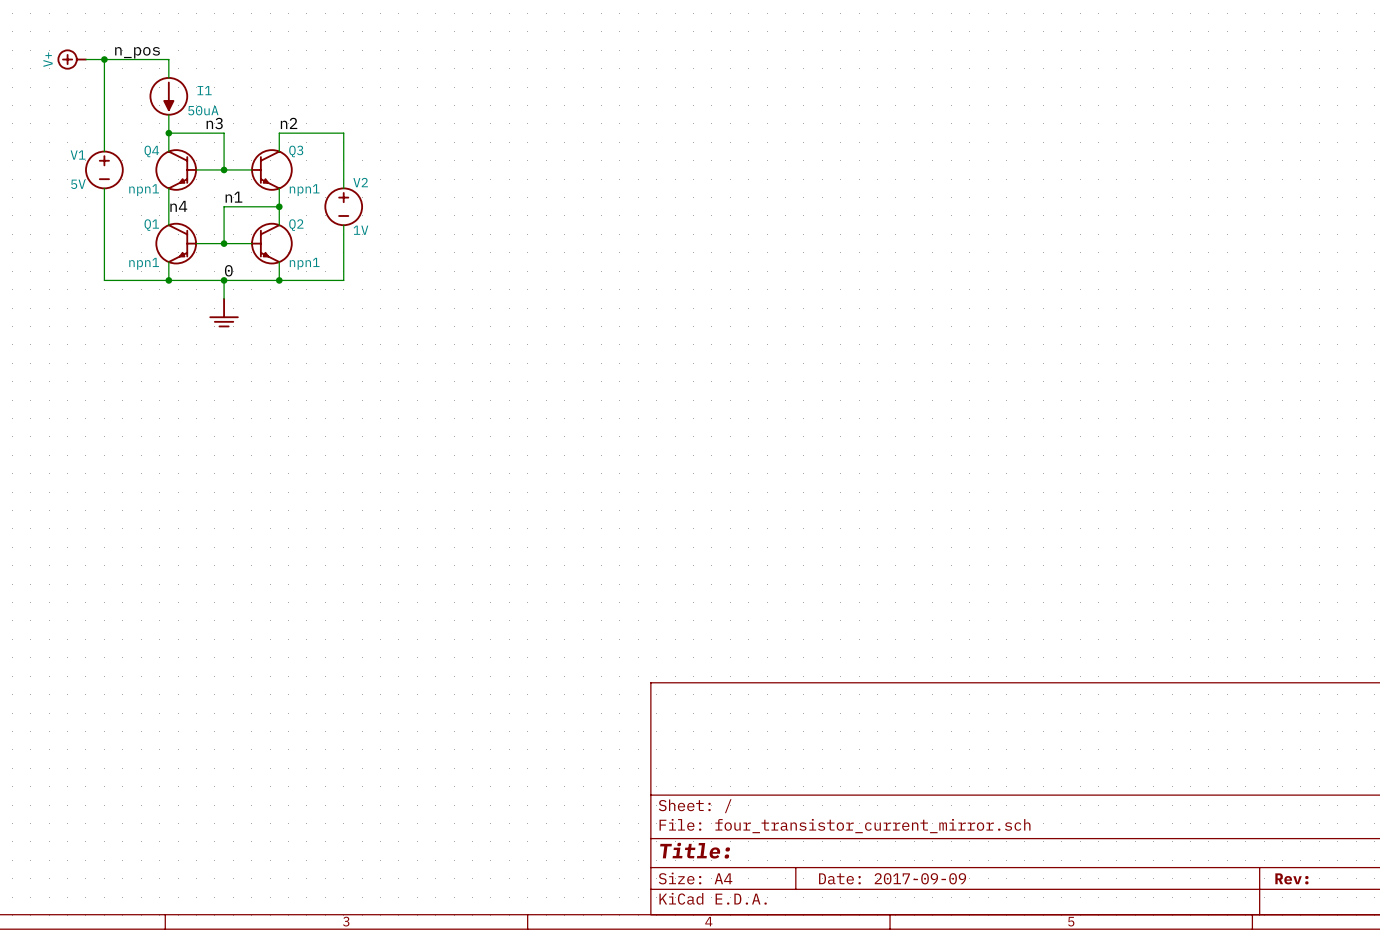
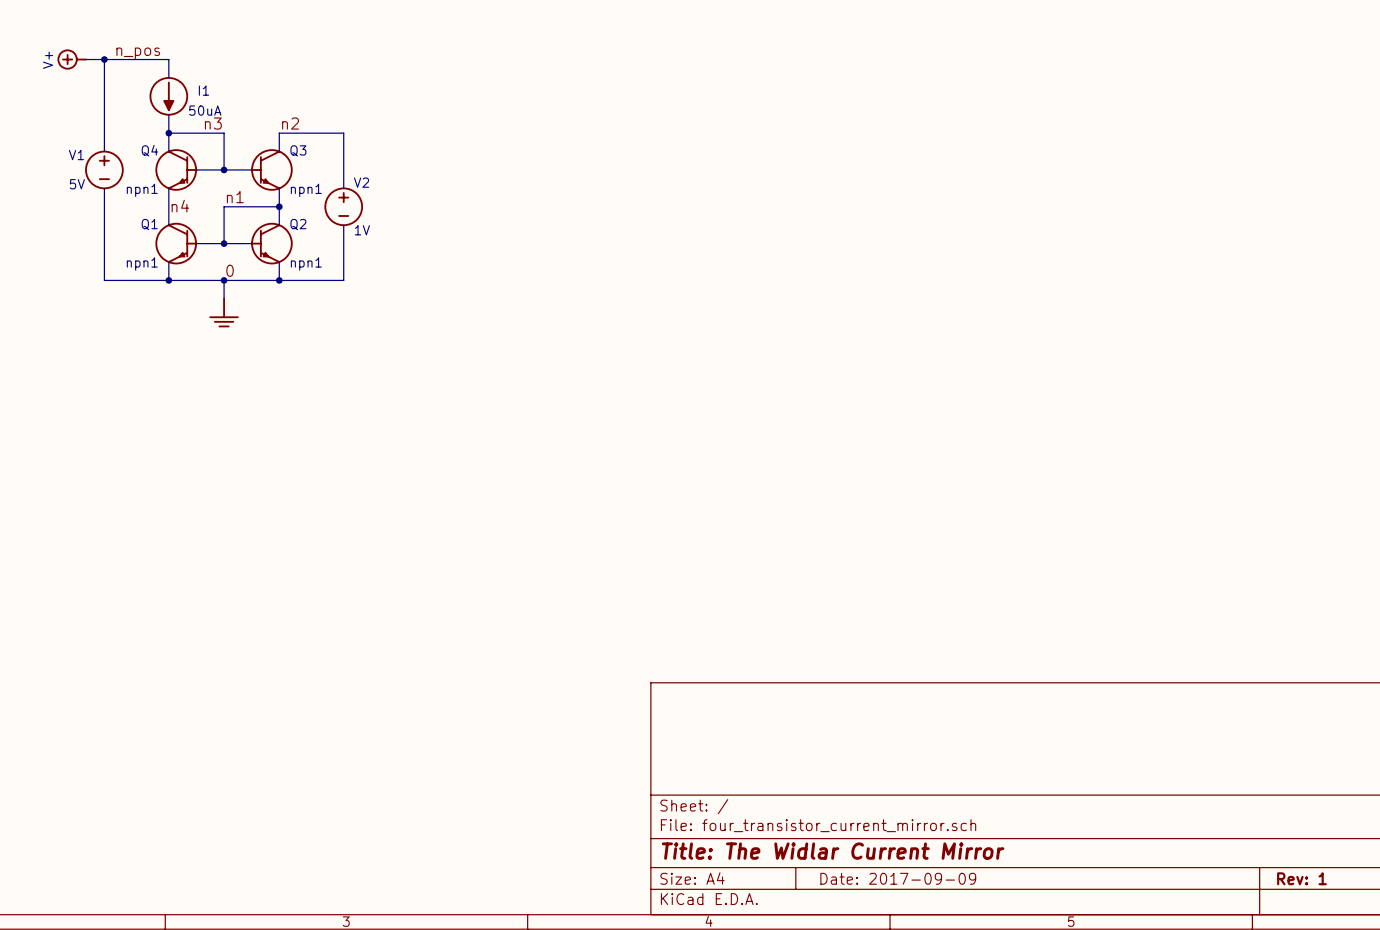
title block: Title: (695, 850) -> Title: The Widlar Current Mirror (833, 851)
title block: Rev: (1291, 878) -> Rev: 1 (1301, 878)

